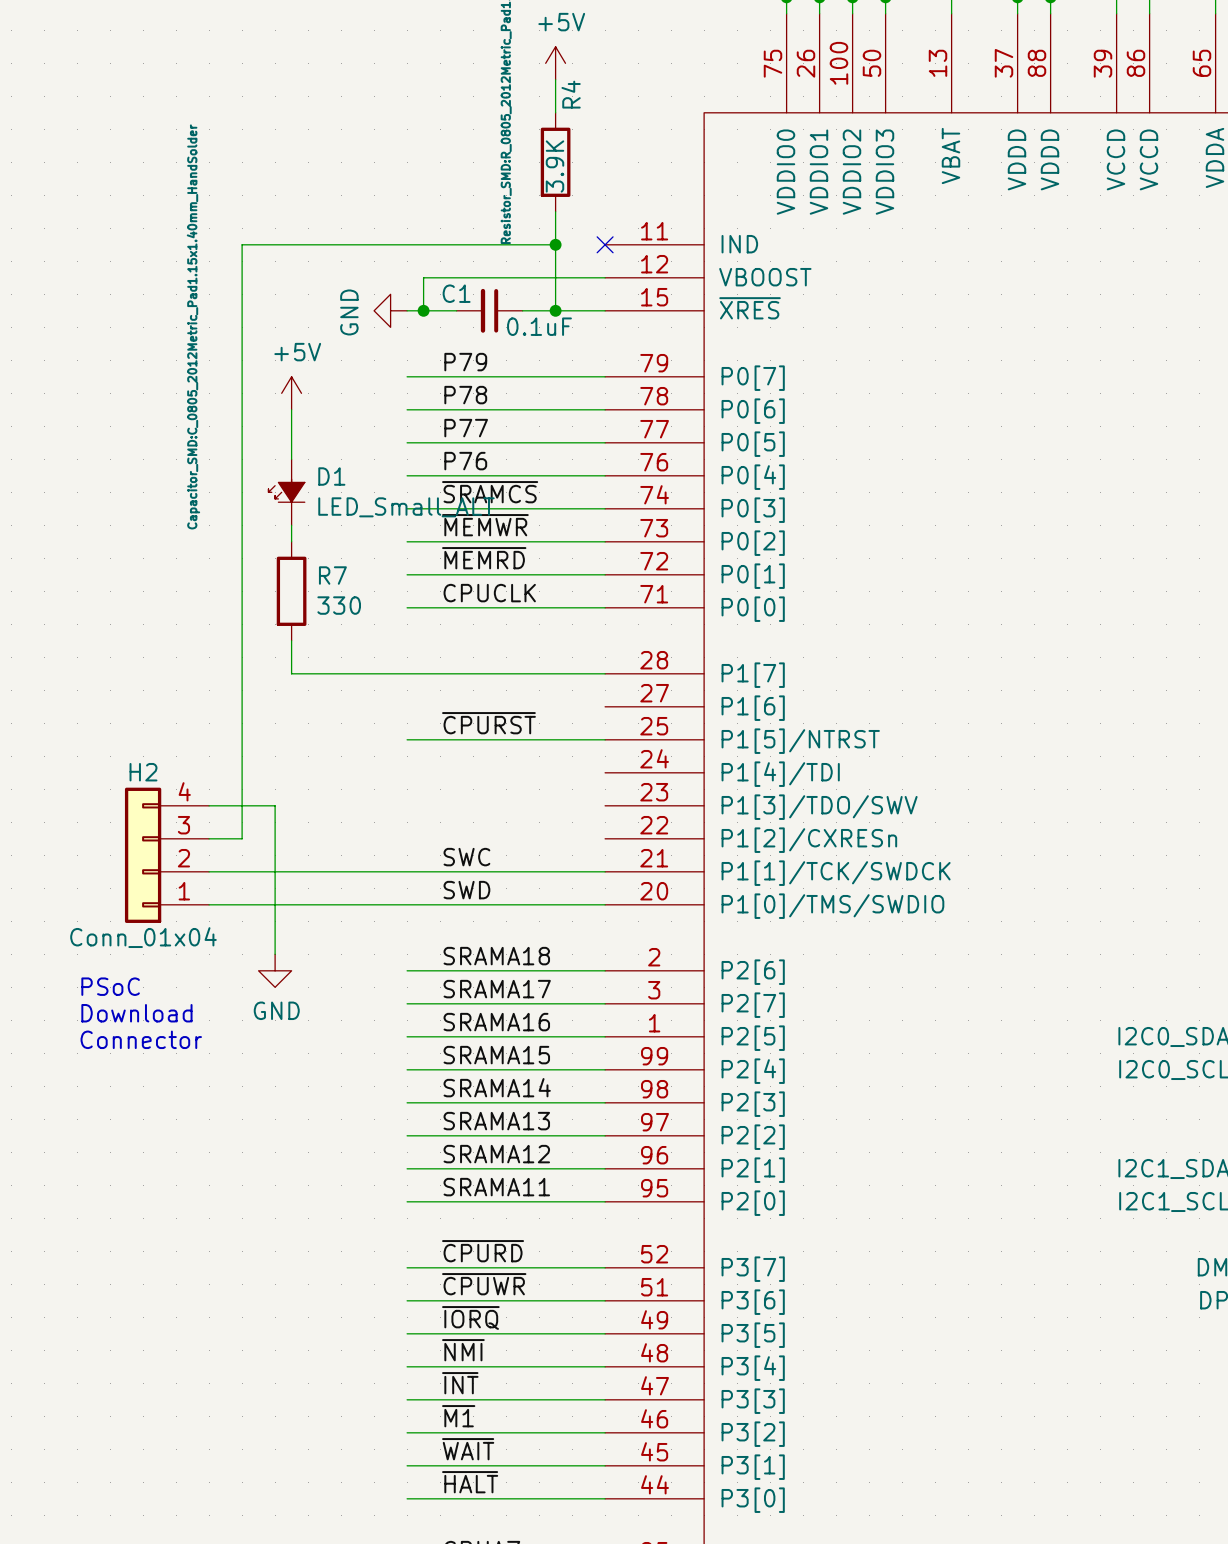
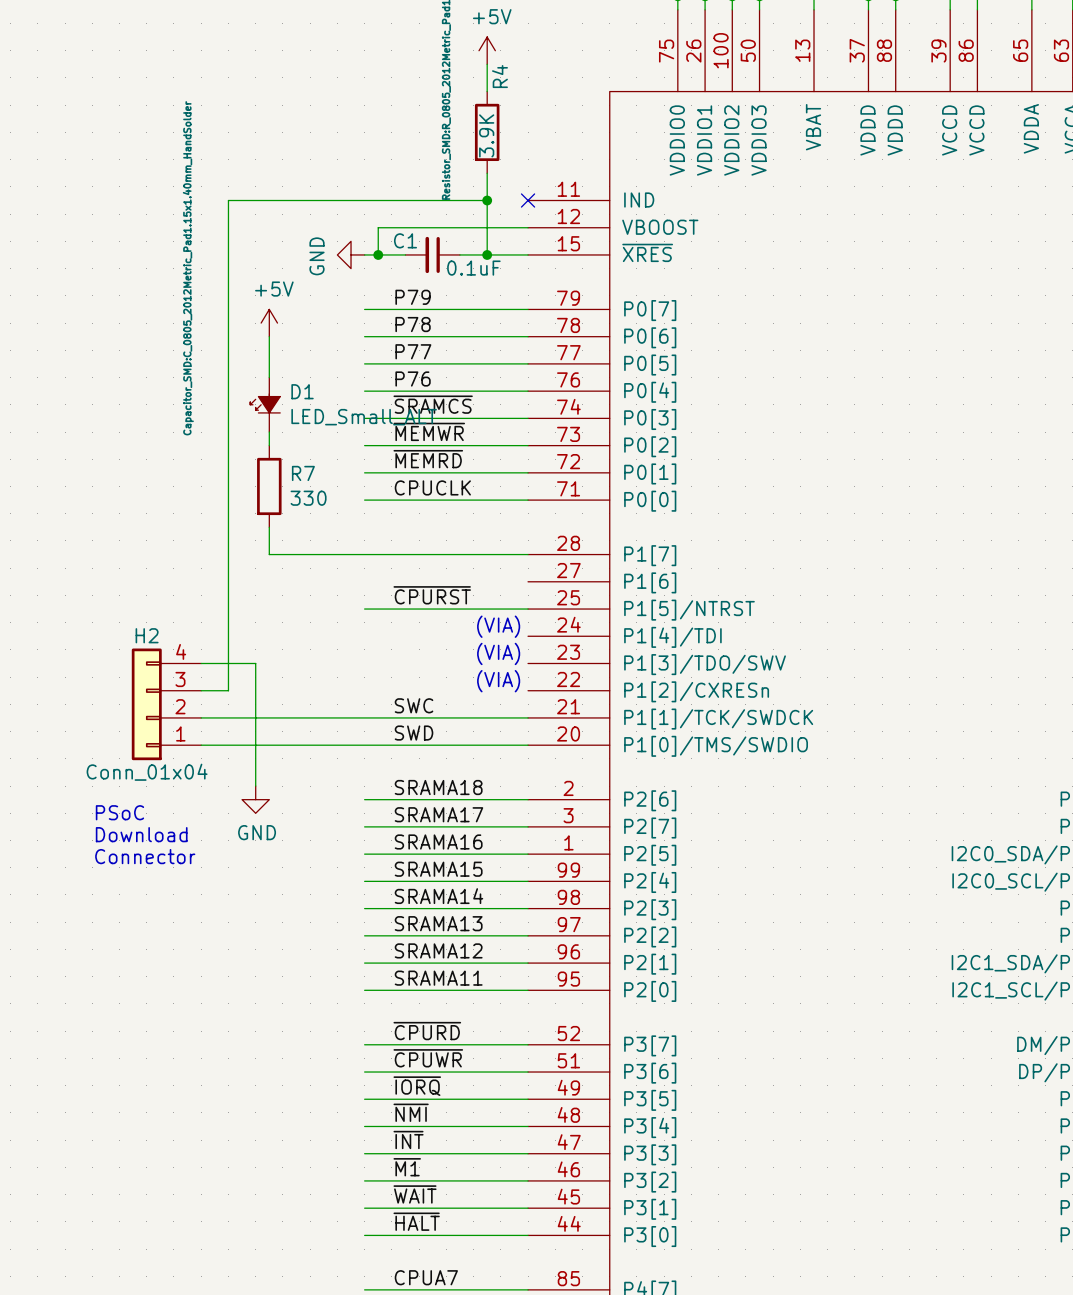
text: none -> (VIA) (498, 626)
text: none -> (VIA) (498, 653)
text: none -> (VIA) (498, 681)

